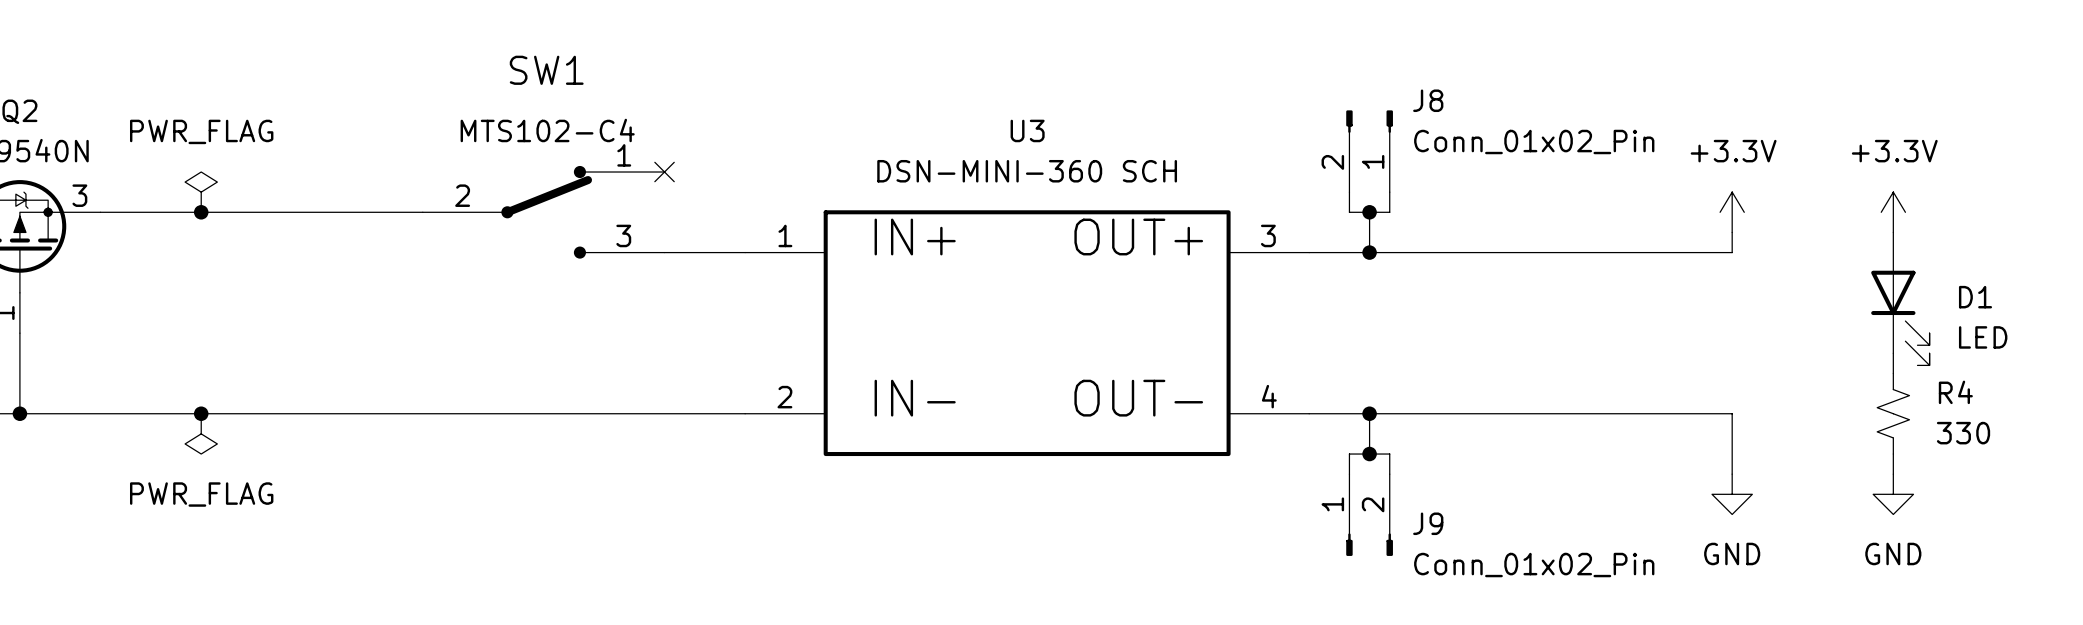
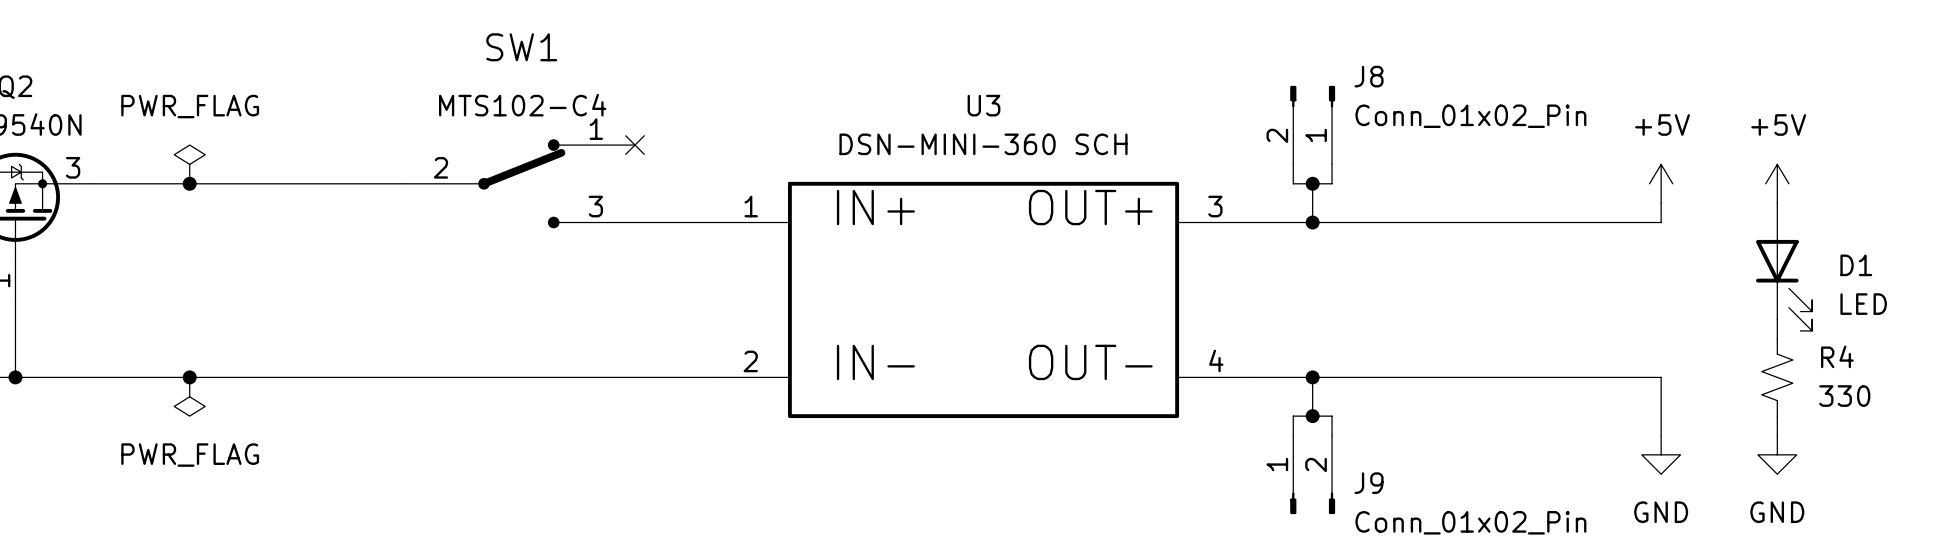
power symbol: +3.3V (1732, 212) -> +5V (1661, 183)
power symbol: none -> +5V (1777, 183)
power symbol: +3.3V (1893, 212) -> none
D1 position: (1900, 298) -> (1784, 267)
wire: (1893, 353) (1893, 373) -> (1777, 319) (1777, 338)
R4 position: (1893, 413) -> (1777, 377)
wire: (1893, 454) (1893, 474) -> (1777, 416) (1777, 435)
power symbol position: GND (1893, 494) -> GND (1777, 454)

